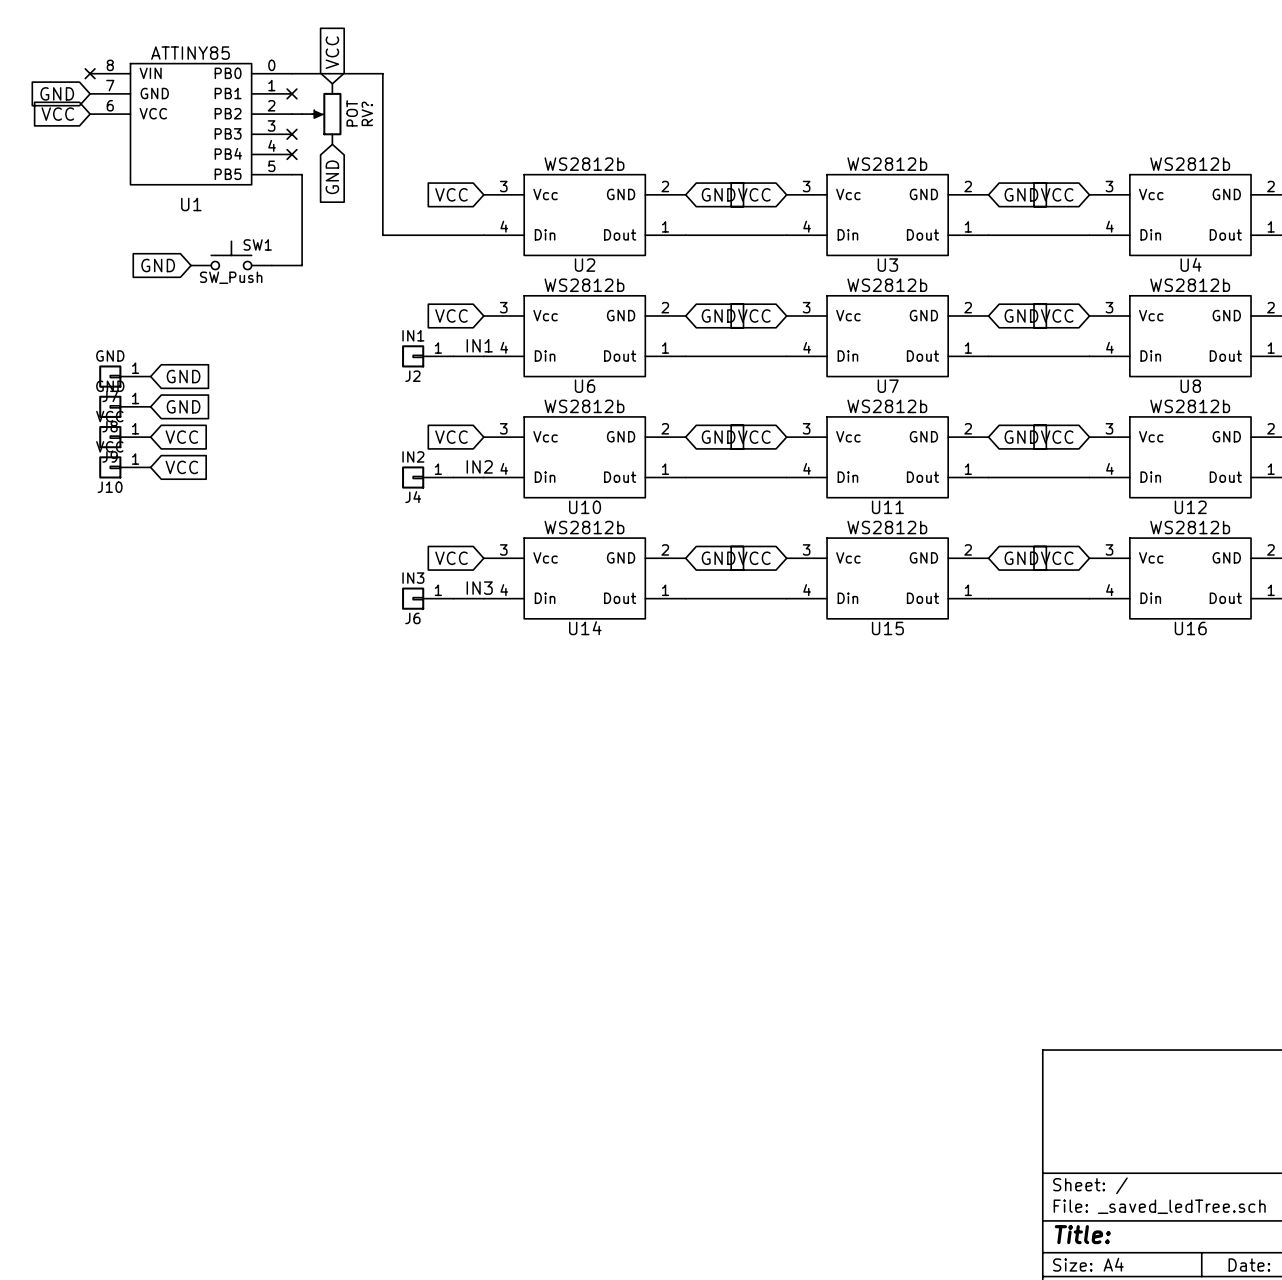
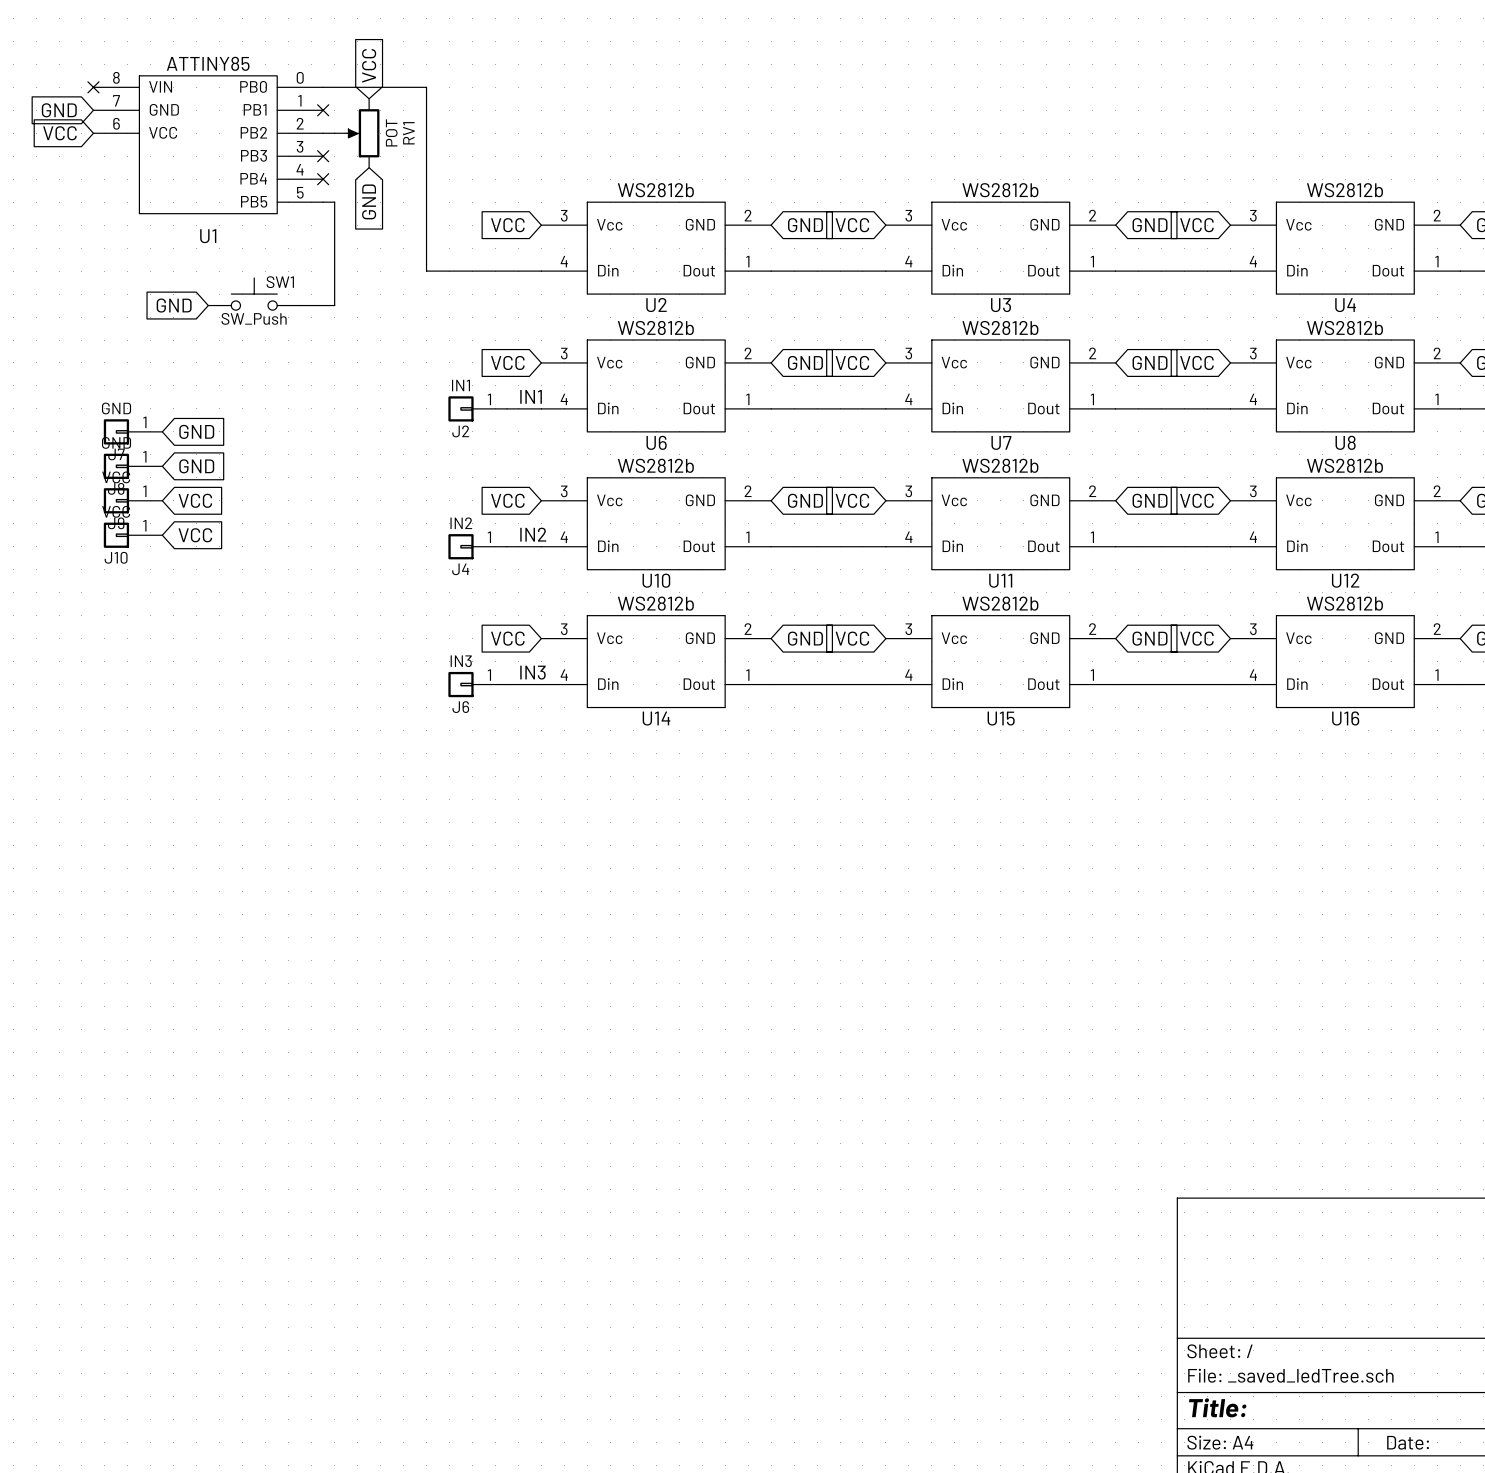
RV? name: RV? (367, 113) -> RV1 (408, 133)

